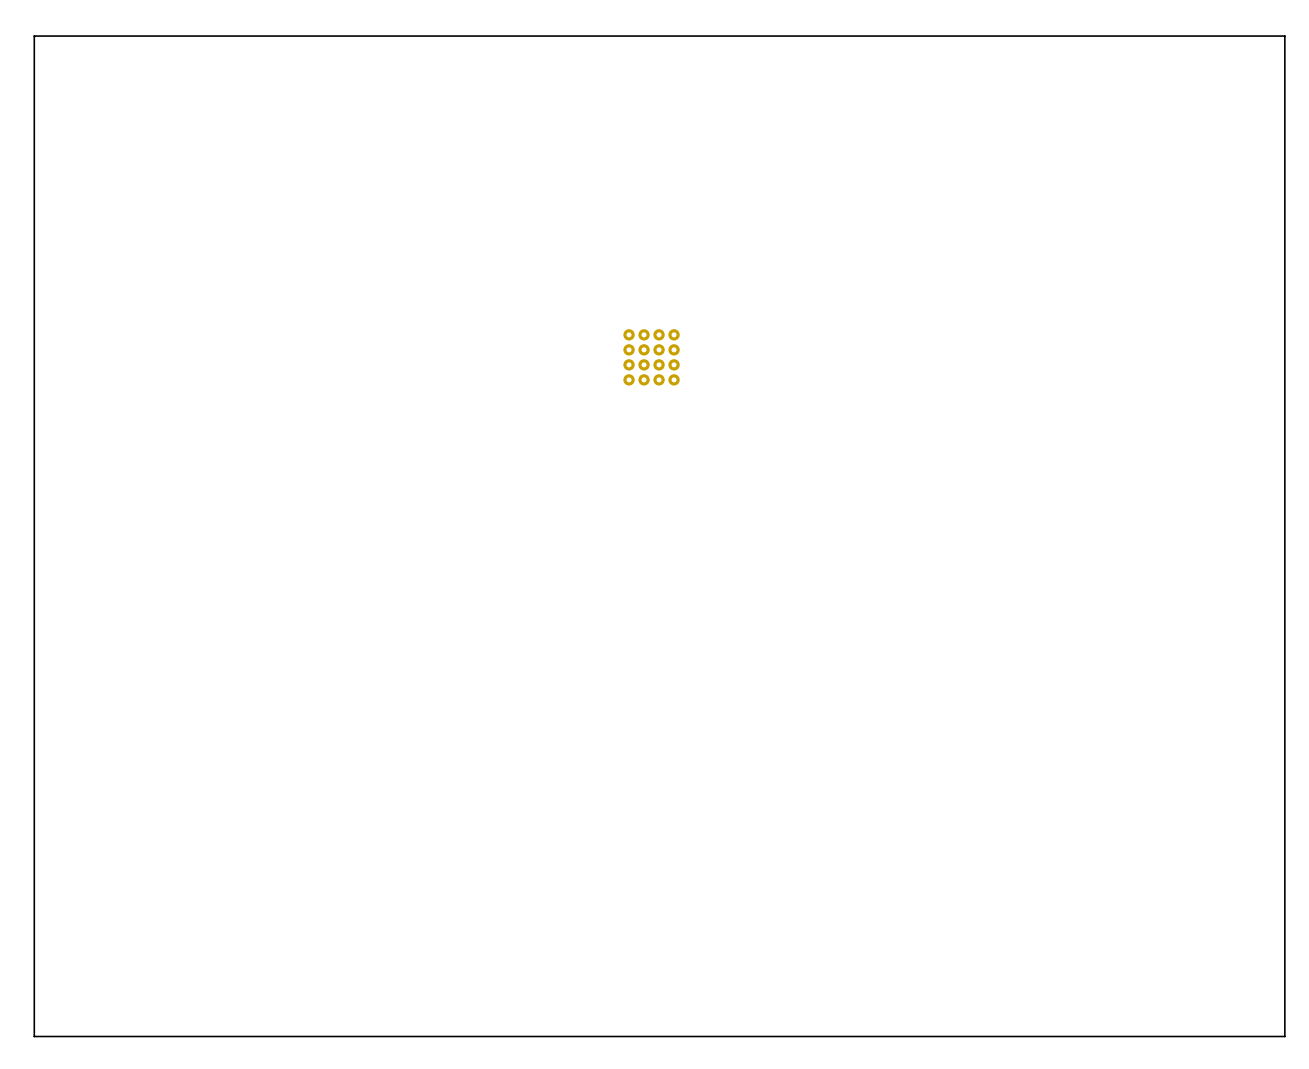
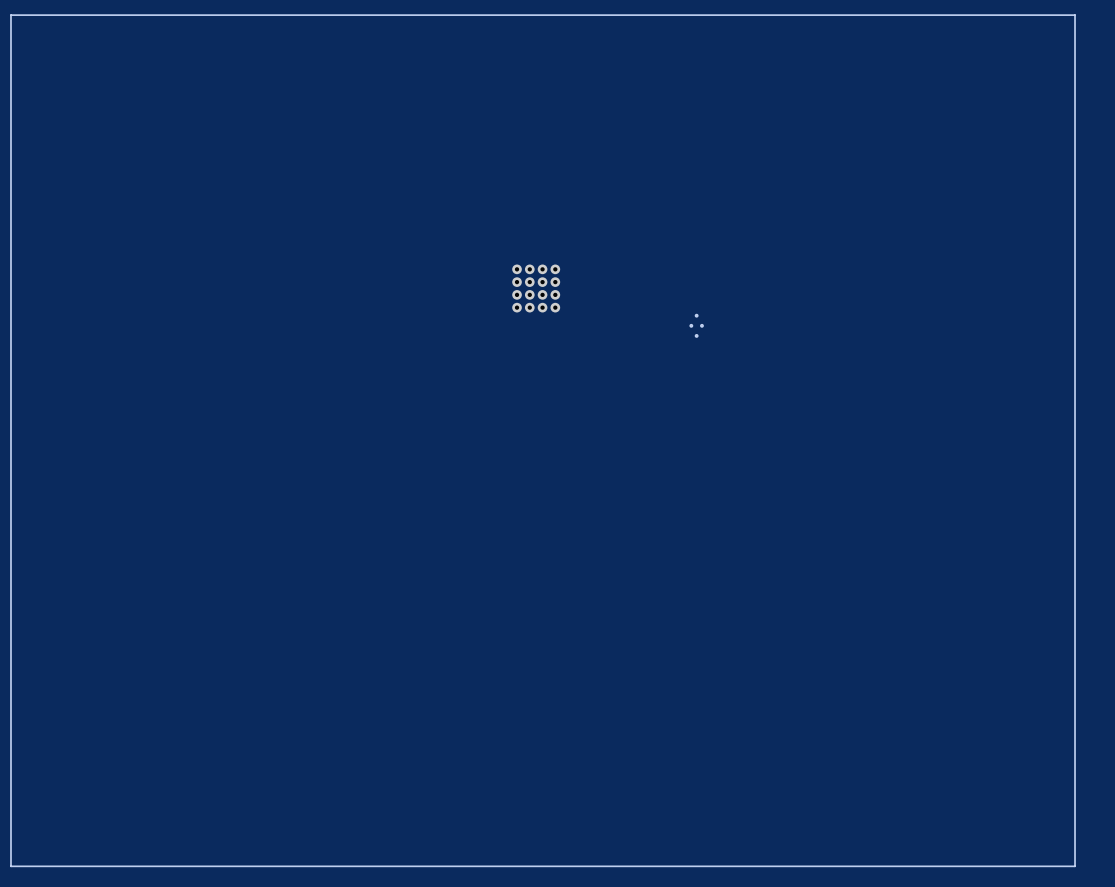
part: none -> (696, 325)

